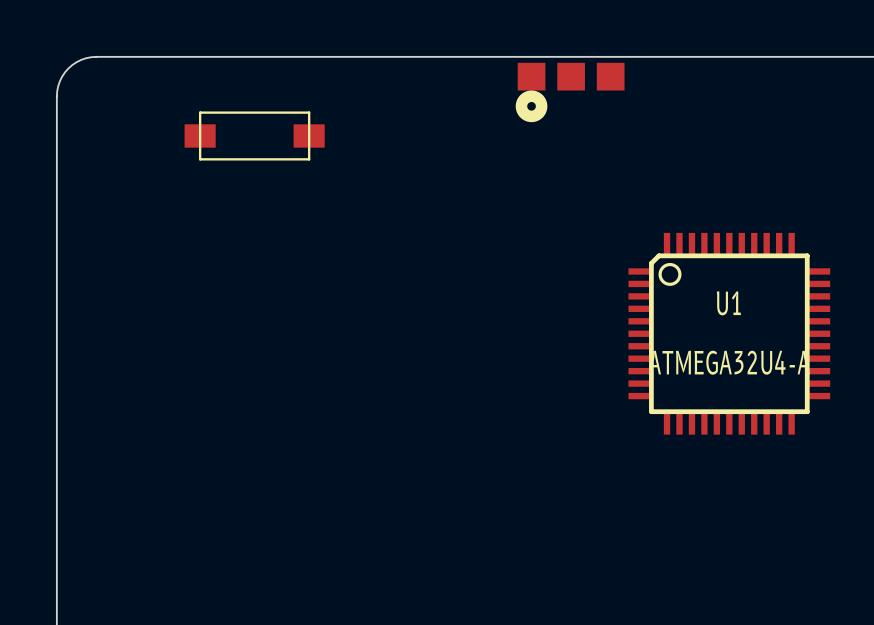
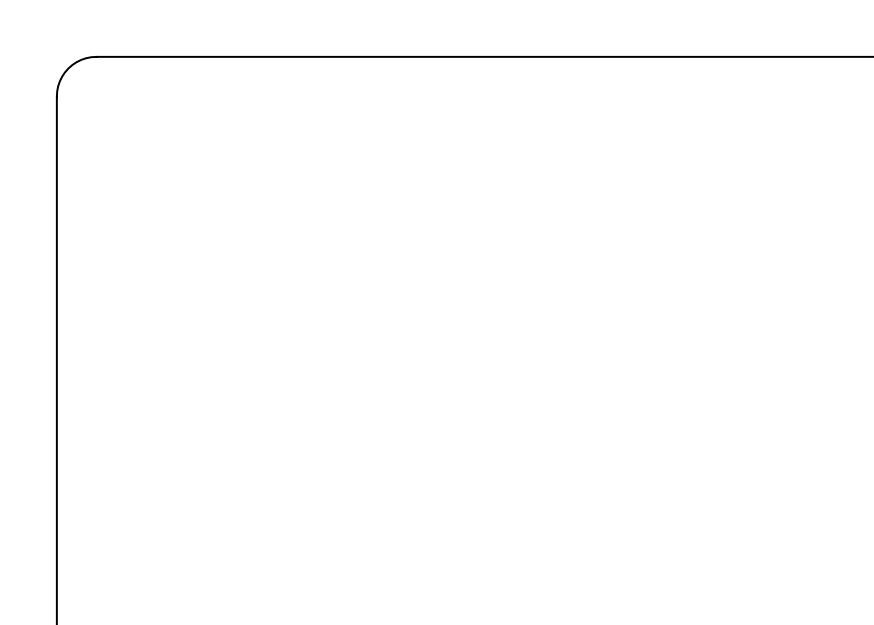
part: (570, 92) -> none
part: (254, 135) -> none
U1: ATMEGA32U4-A (729, 333) -> none

